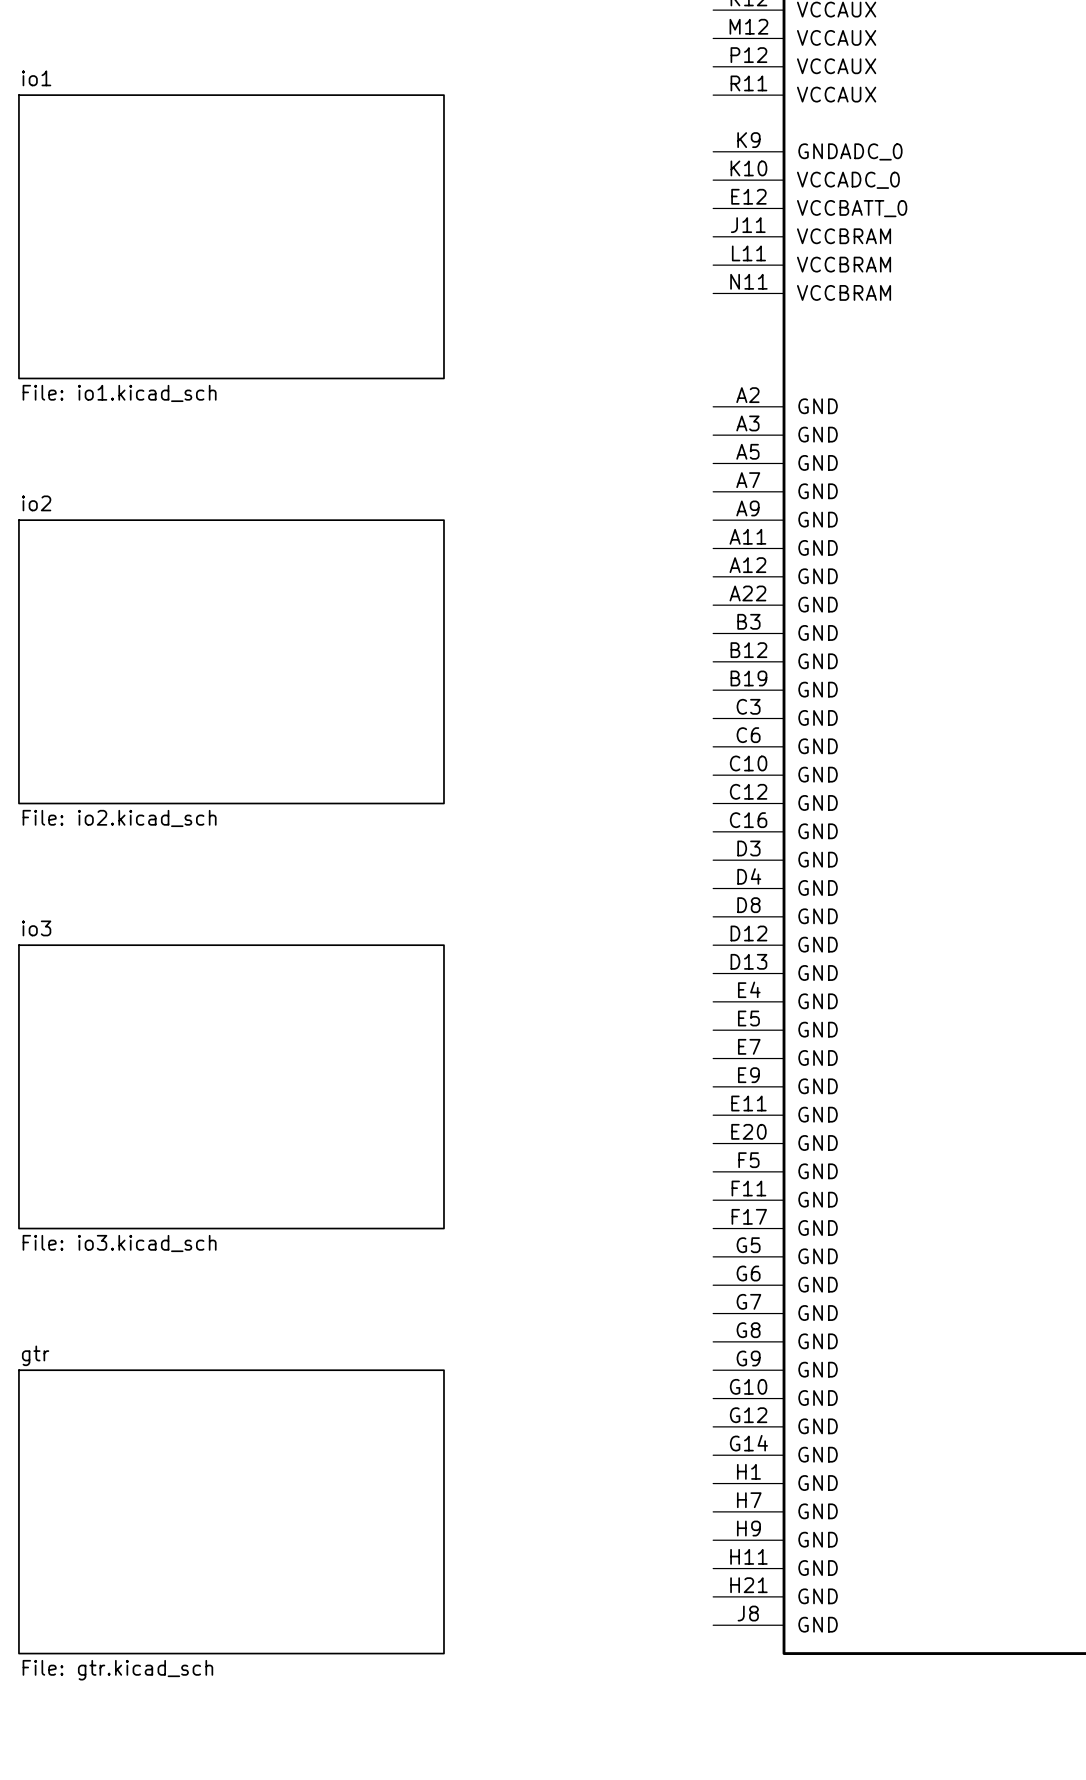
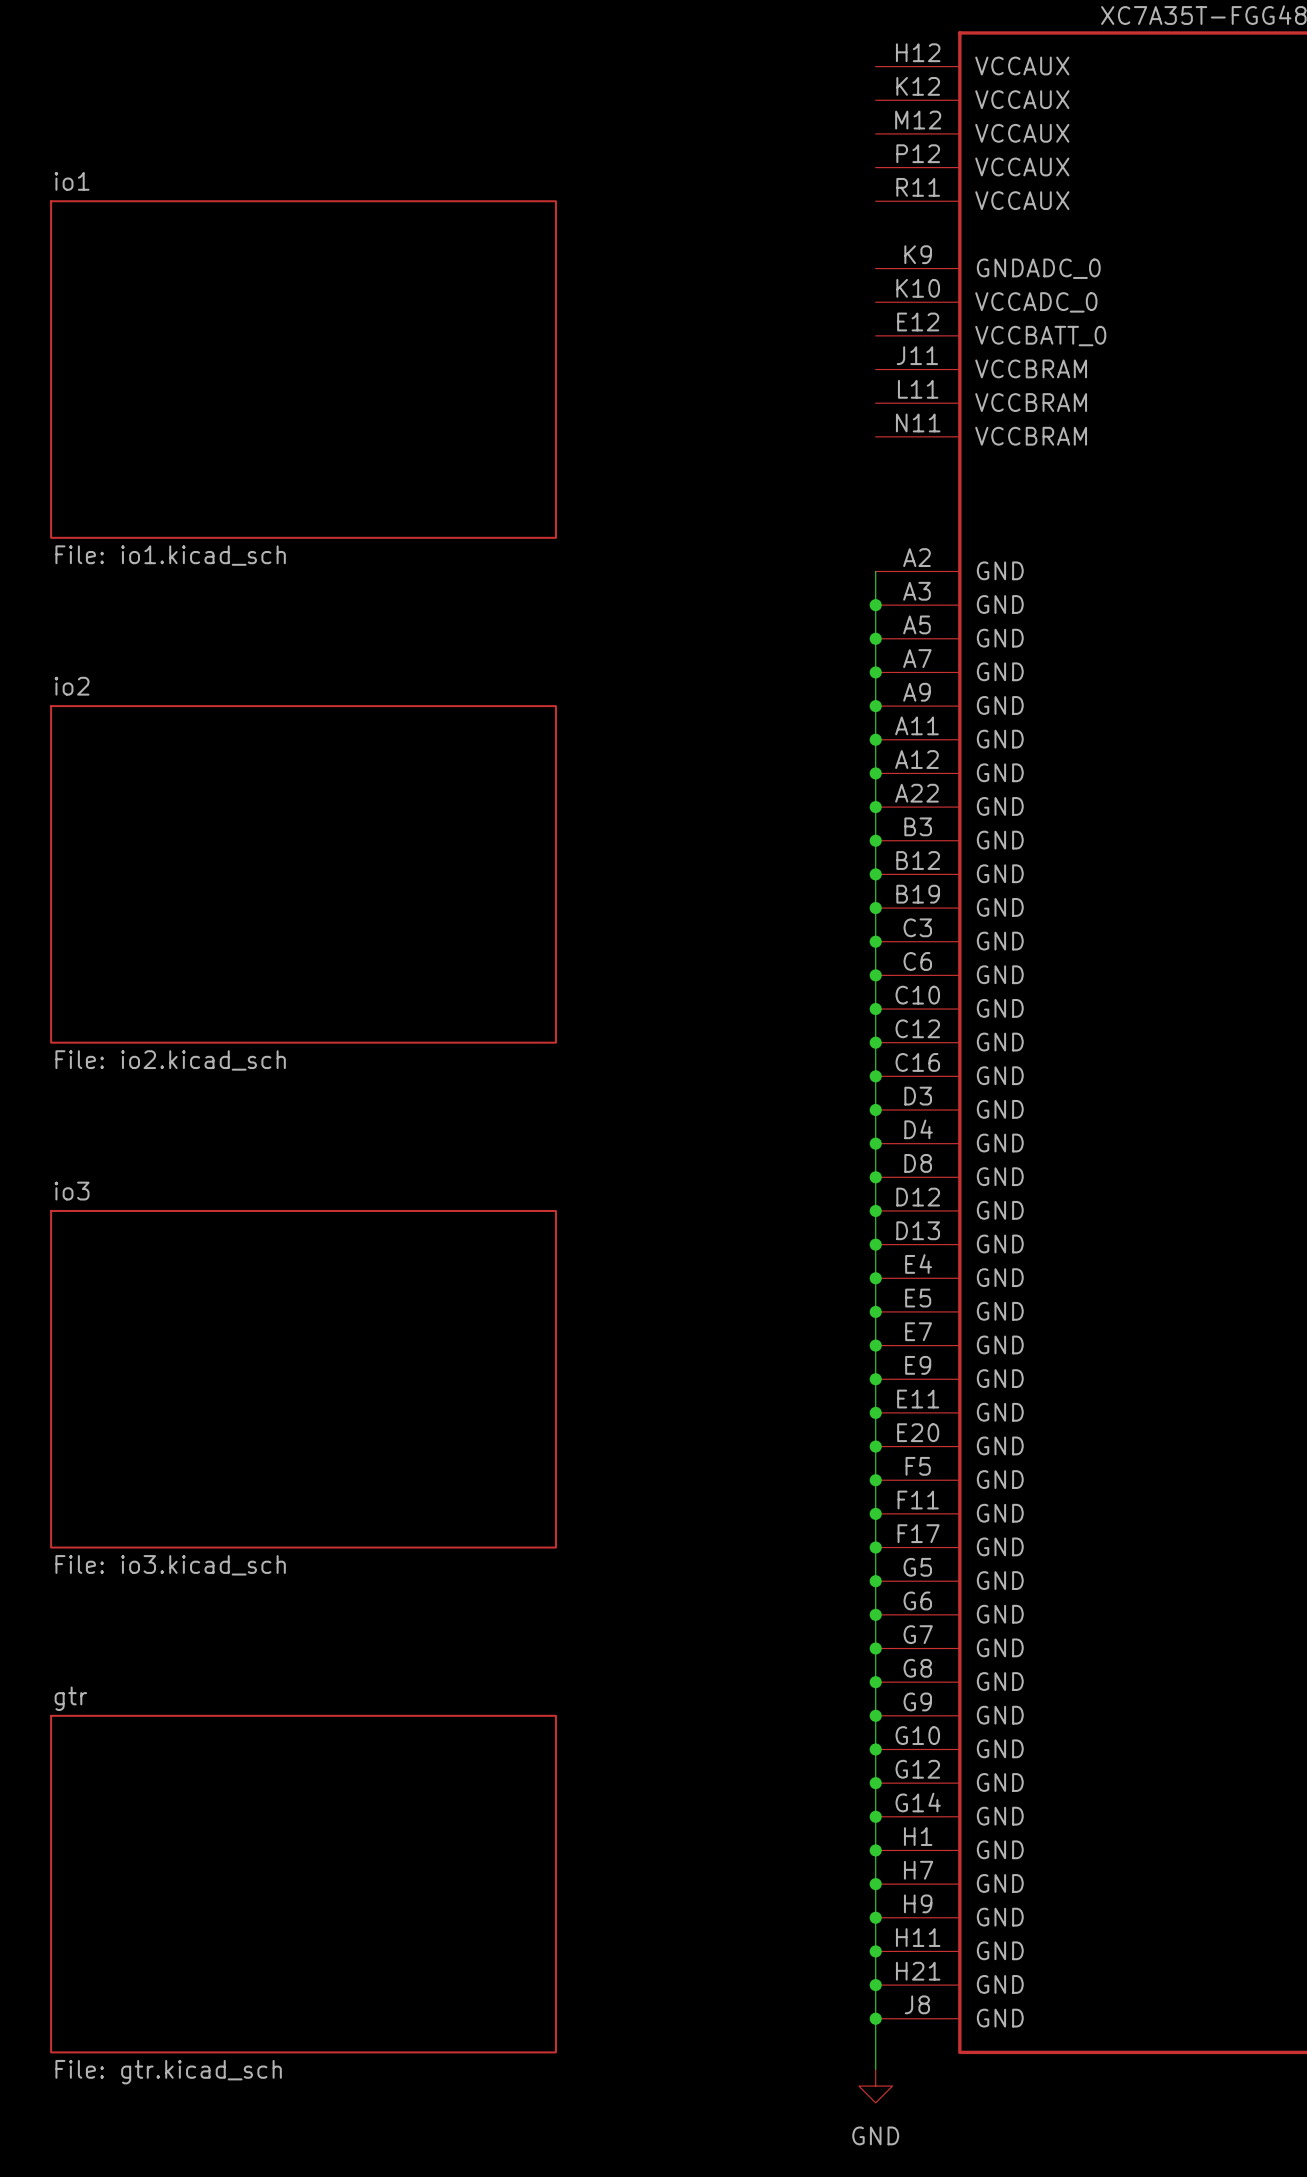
wire: none -> (875, 571) (875, 2069)
junction: none -> (875, 605)
junction: none -> (875, 638)
junction: none -> (875, 672)
junction: none -> (875, 706)
junction: none -> (875, 739)
junction: none -> (875, 773)
junction: none -> (875, 807)
junction: none -> (875, 840)
junction: none -> (875, 874)
junction: none -> (875, 908)
junction: none -> (875, 941)
junction: none -> (875, 975)
junction: none -> (875, 1009)
junction: none -> (875, 1042)
junction: none -> (875, 1076)
junction: none -> (875, 1109)
junction: none -> (875, 1143)
junction: none -> (875, 1177)
junction: none -> (875, 1210)
junction: none -> (875, 1244)
junction: none -> (875, 1278)
junction: none -> (875, 1311)
junction: none -> (875, 1345)
junction: none -> (875, 1379)
junction: none -> (875, 1412)
junction: none -> (875, 1446)
junction: none -> (875, 1480)
junction: none -> (875, 1513)
junction: none -> (875, 1547)
junction: none -> (875, 1581)
junction: none -> (875, 1614)
junction: none -> (875, 1648)
junction: none -> (875, 1682)
junction: none -> (875, 1715)
junction: none -> (875, 1749)
junction: none -> (875, 1783)
junction: none -> (875, 1816)
junction: none -> (875, 1850)
junction: none -> (875, 1884)
junction: none -> (875, 1917)
junction: none -> (875, 1951)
junction: none -> (875, 1985)
junction: none -> (875, 2018)
power symbol: none -> GND (875, 2086)

